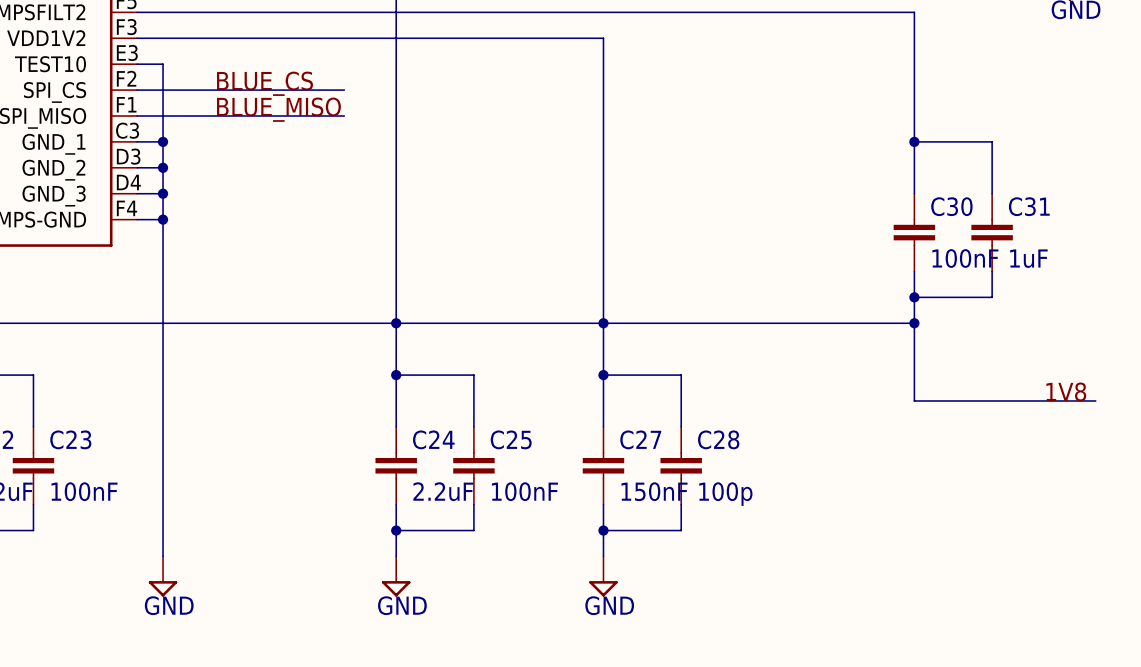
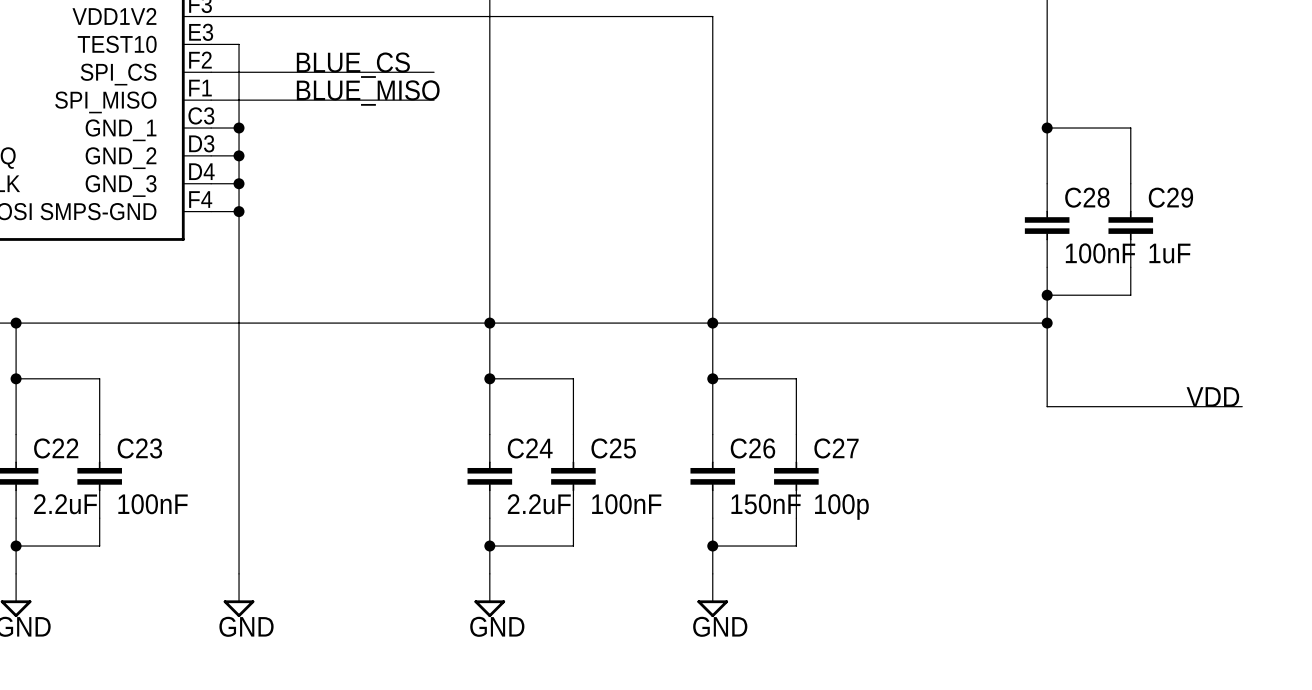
C30 name: C30 (951, 206) -> C28 (1087, 197)
C31 name: C31 (1029, 206) -> C29 (1170, 197)
label: 1V8 (1066, 391) -> VDD (1212, 396)
C27 name: C27 (640, 439) -> C26 (752, 448)
C28 name: C28 (718, 439) -> C27 (836, 448)

